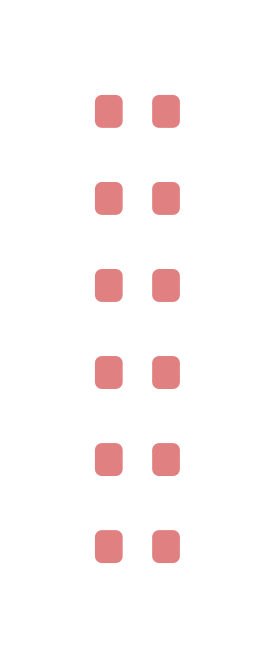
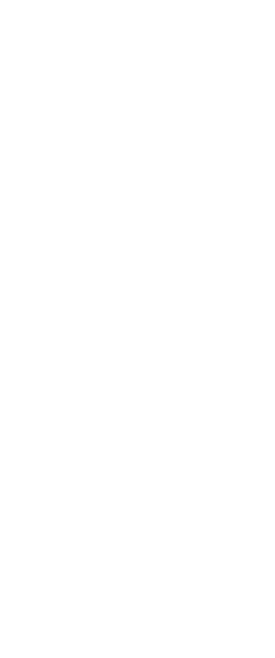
part: (137, 111) -> none
part: (137, 198) -> none
part: (137, 285) -> none
part: (137, 372) -> none
part: (137, 459) -> none
part: (137, 546) -> none

